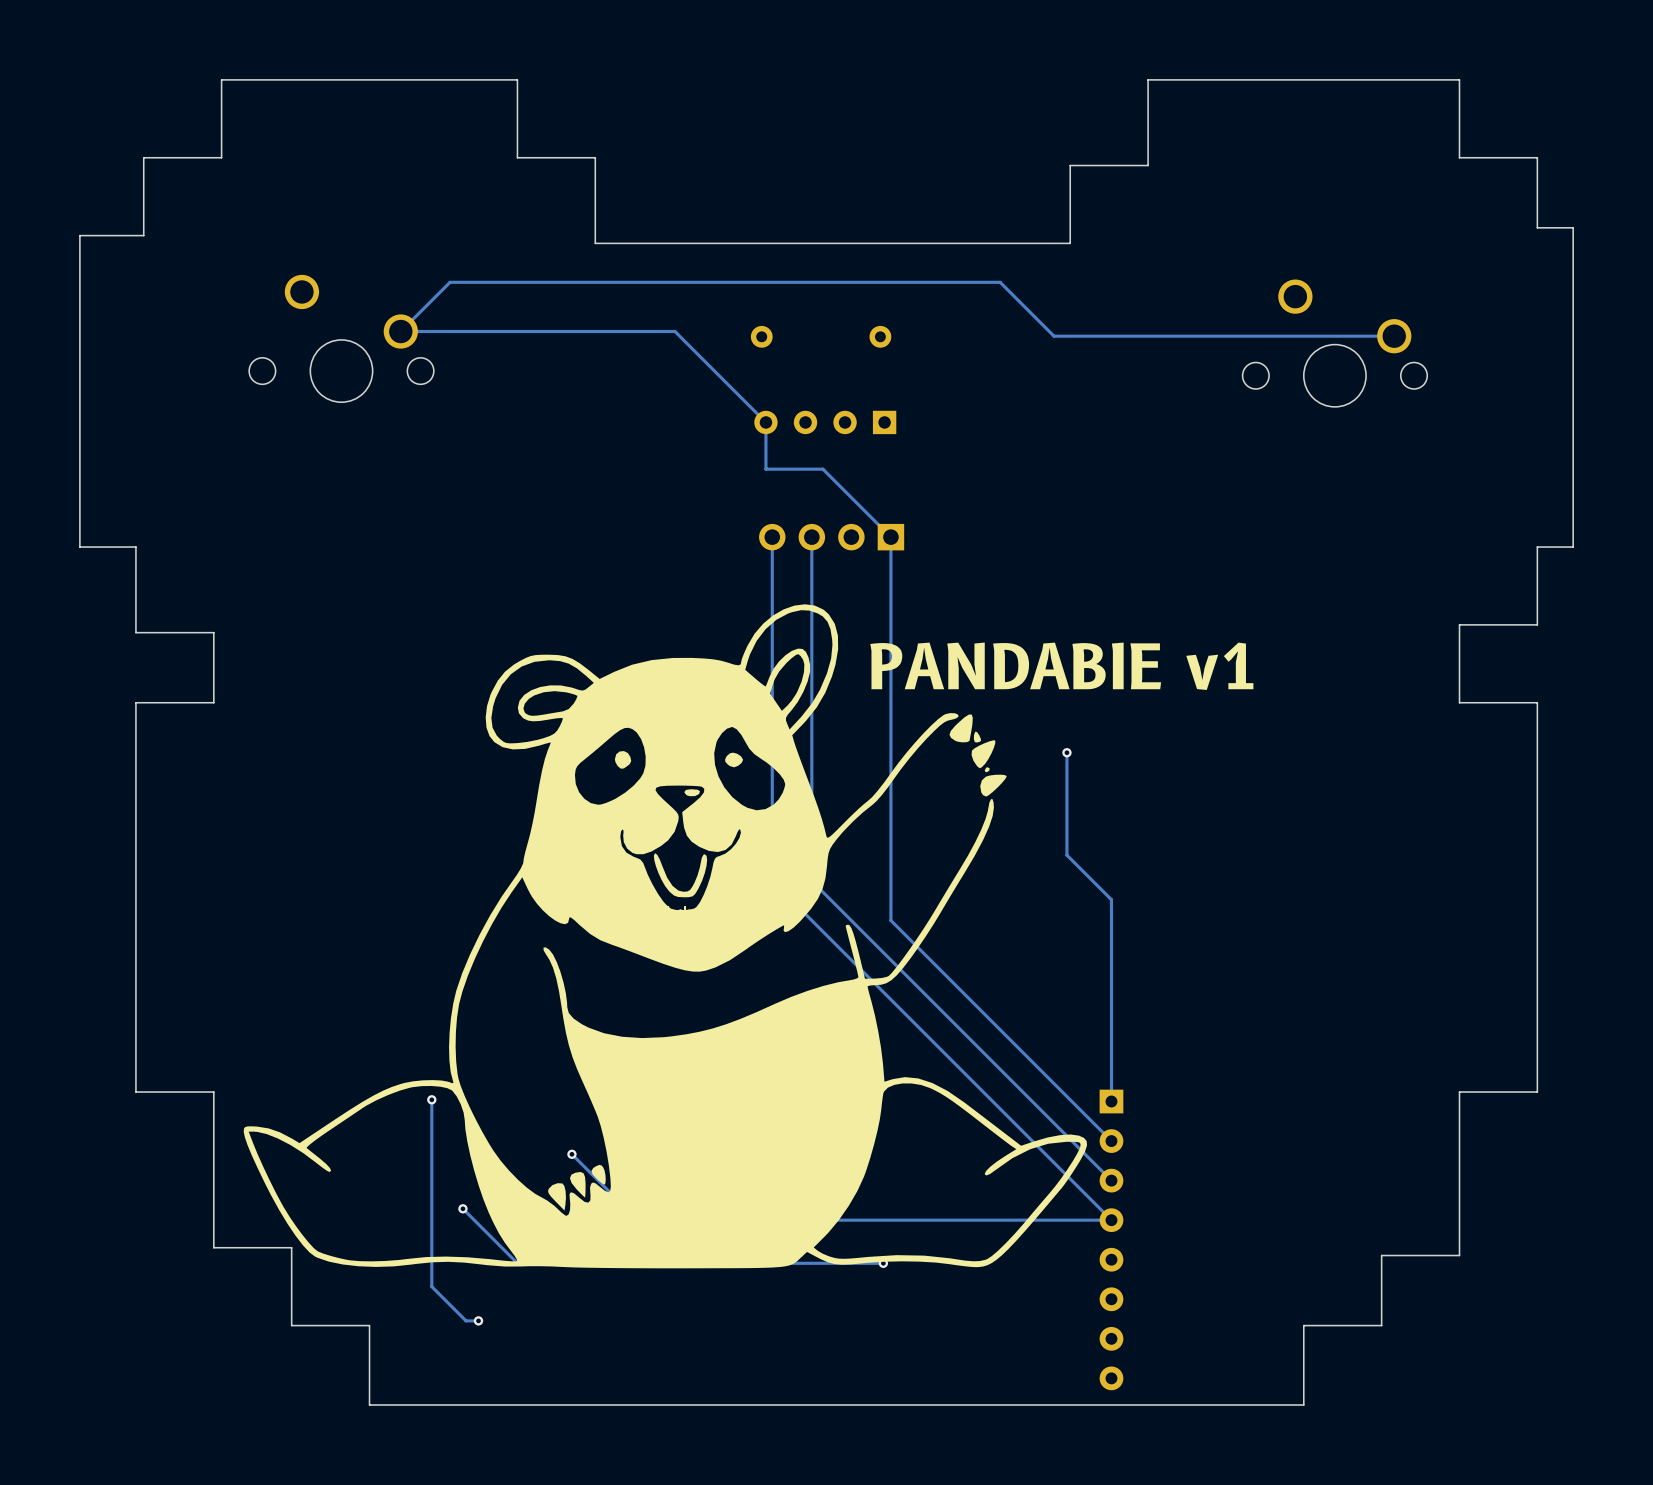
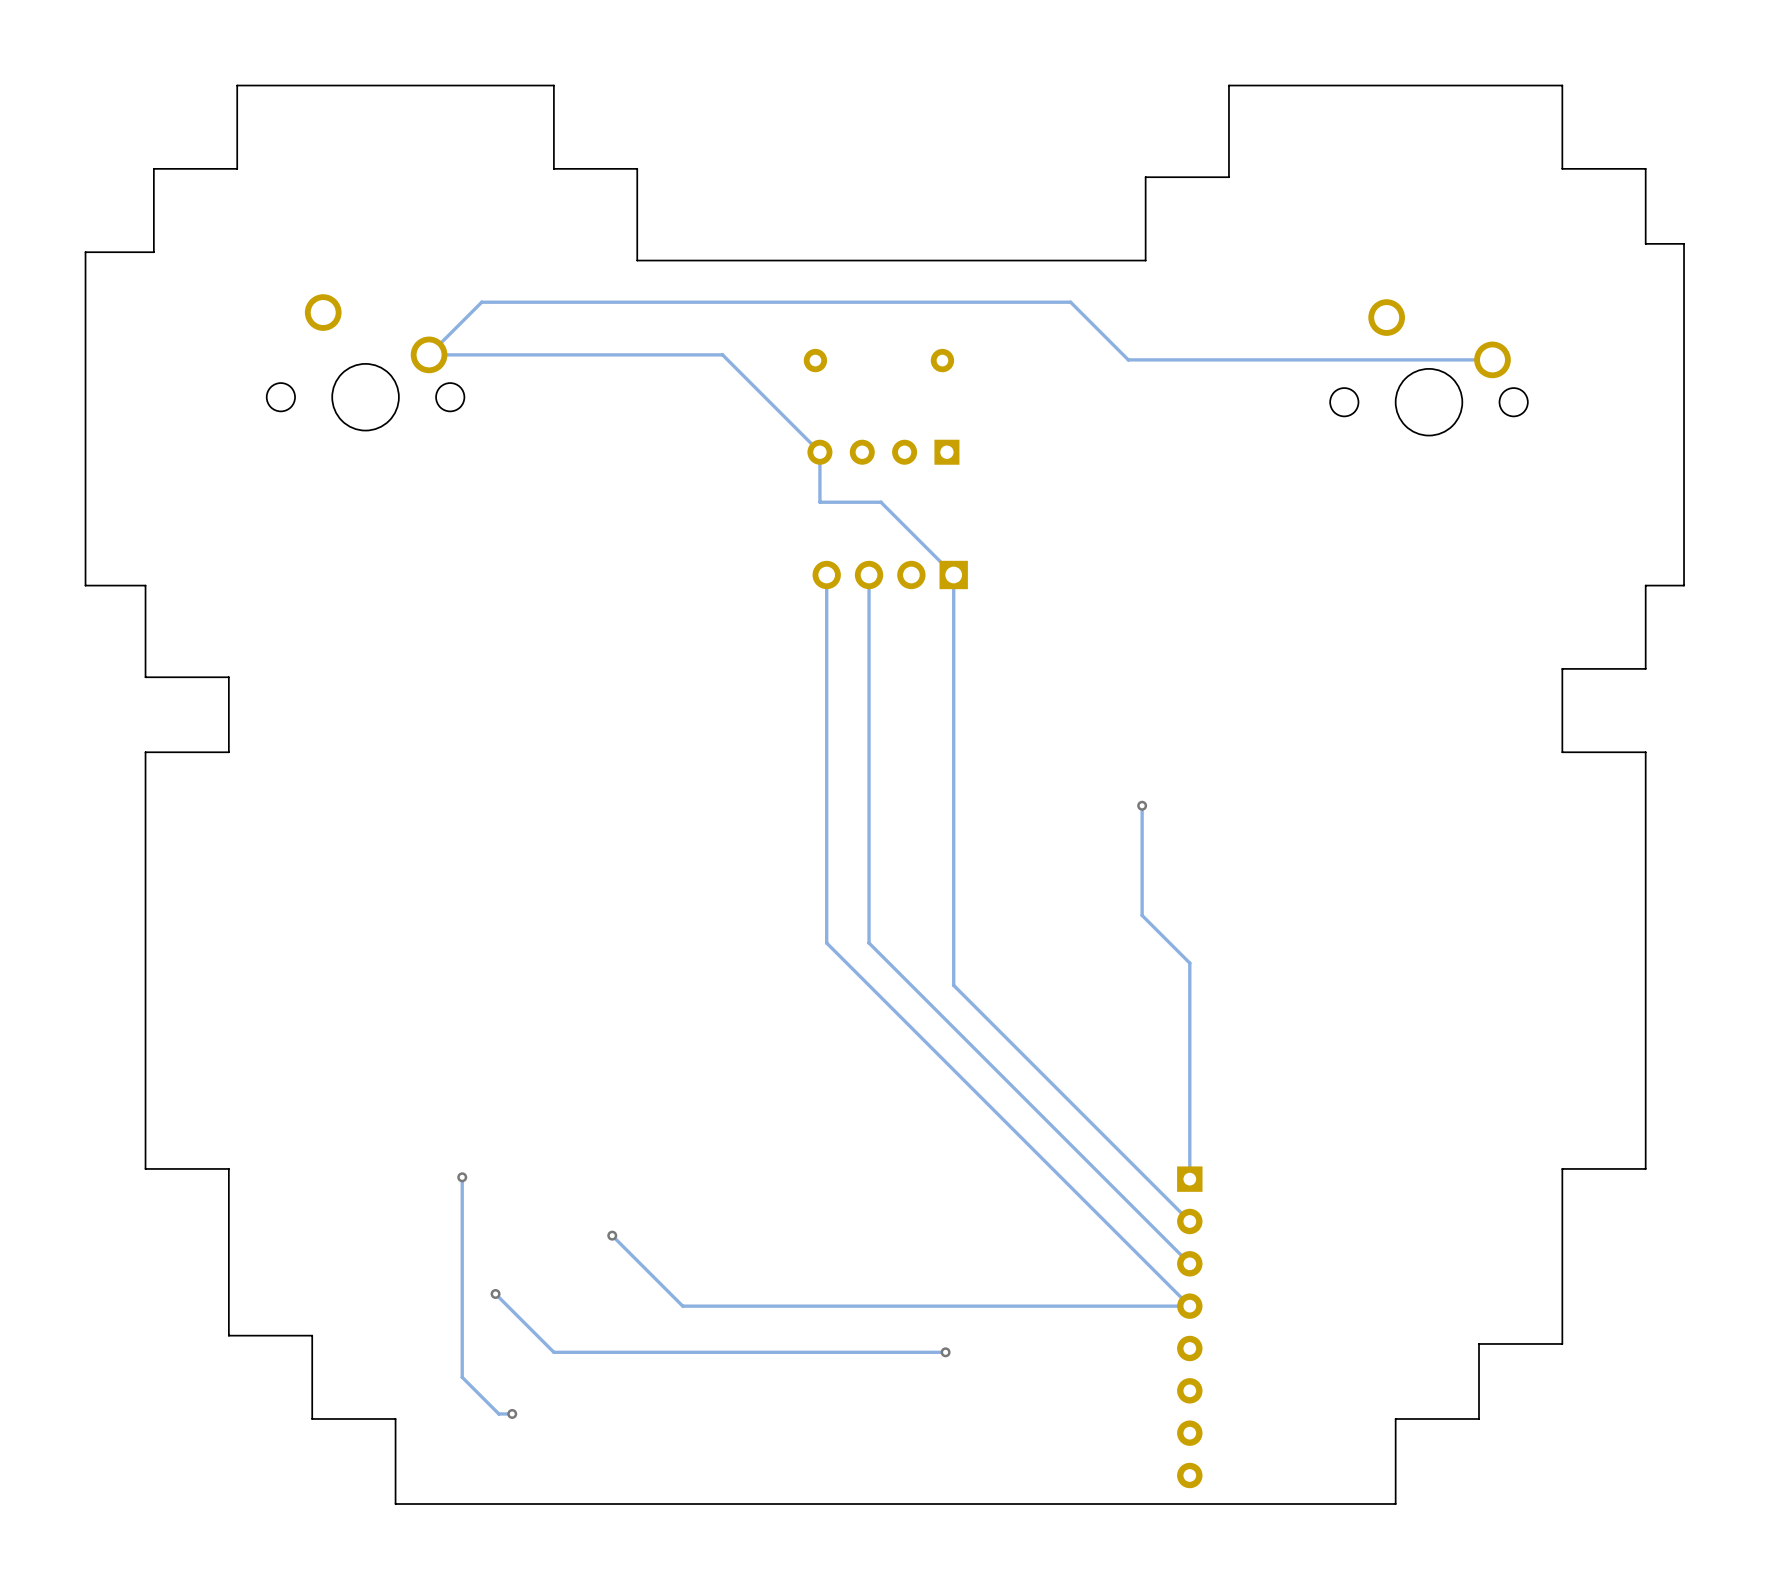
text: PANDABIE v1 (1061, 666) -> none
part: (665, 936) -> none

